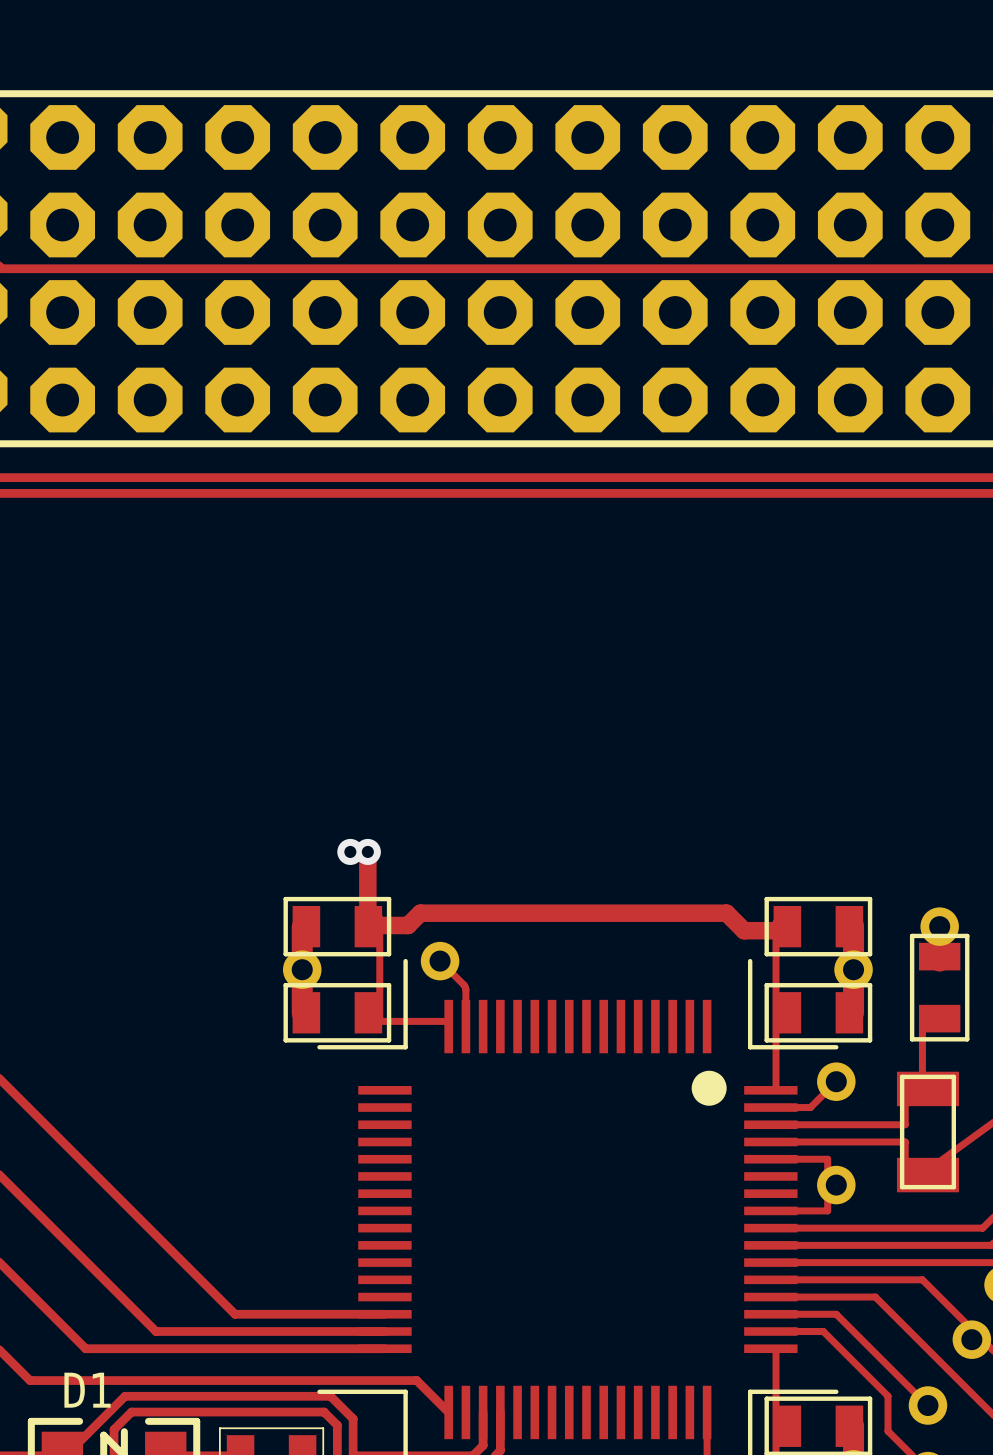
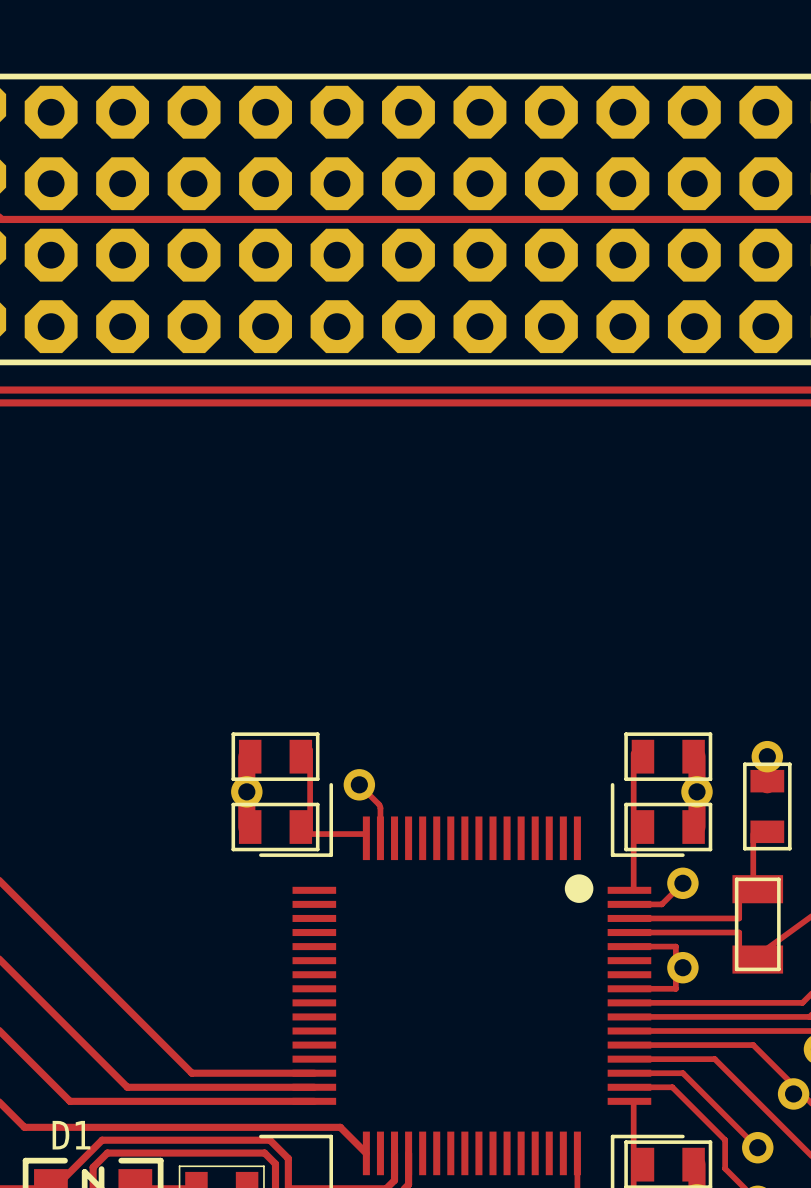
via: (350, 851) -> none
track: (367, 851) (367, 920) (372, 925) (408, 925) (420, 913) (726, 913) (744, 930) (777, 930) (781, 927) -> none
via: (367, 851) -> none

